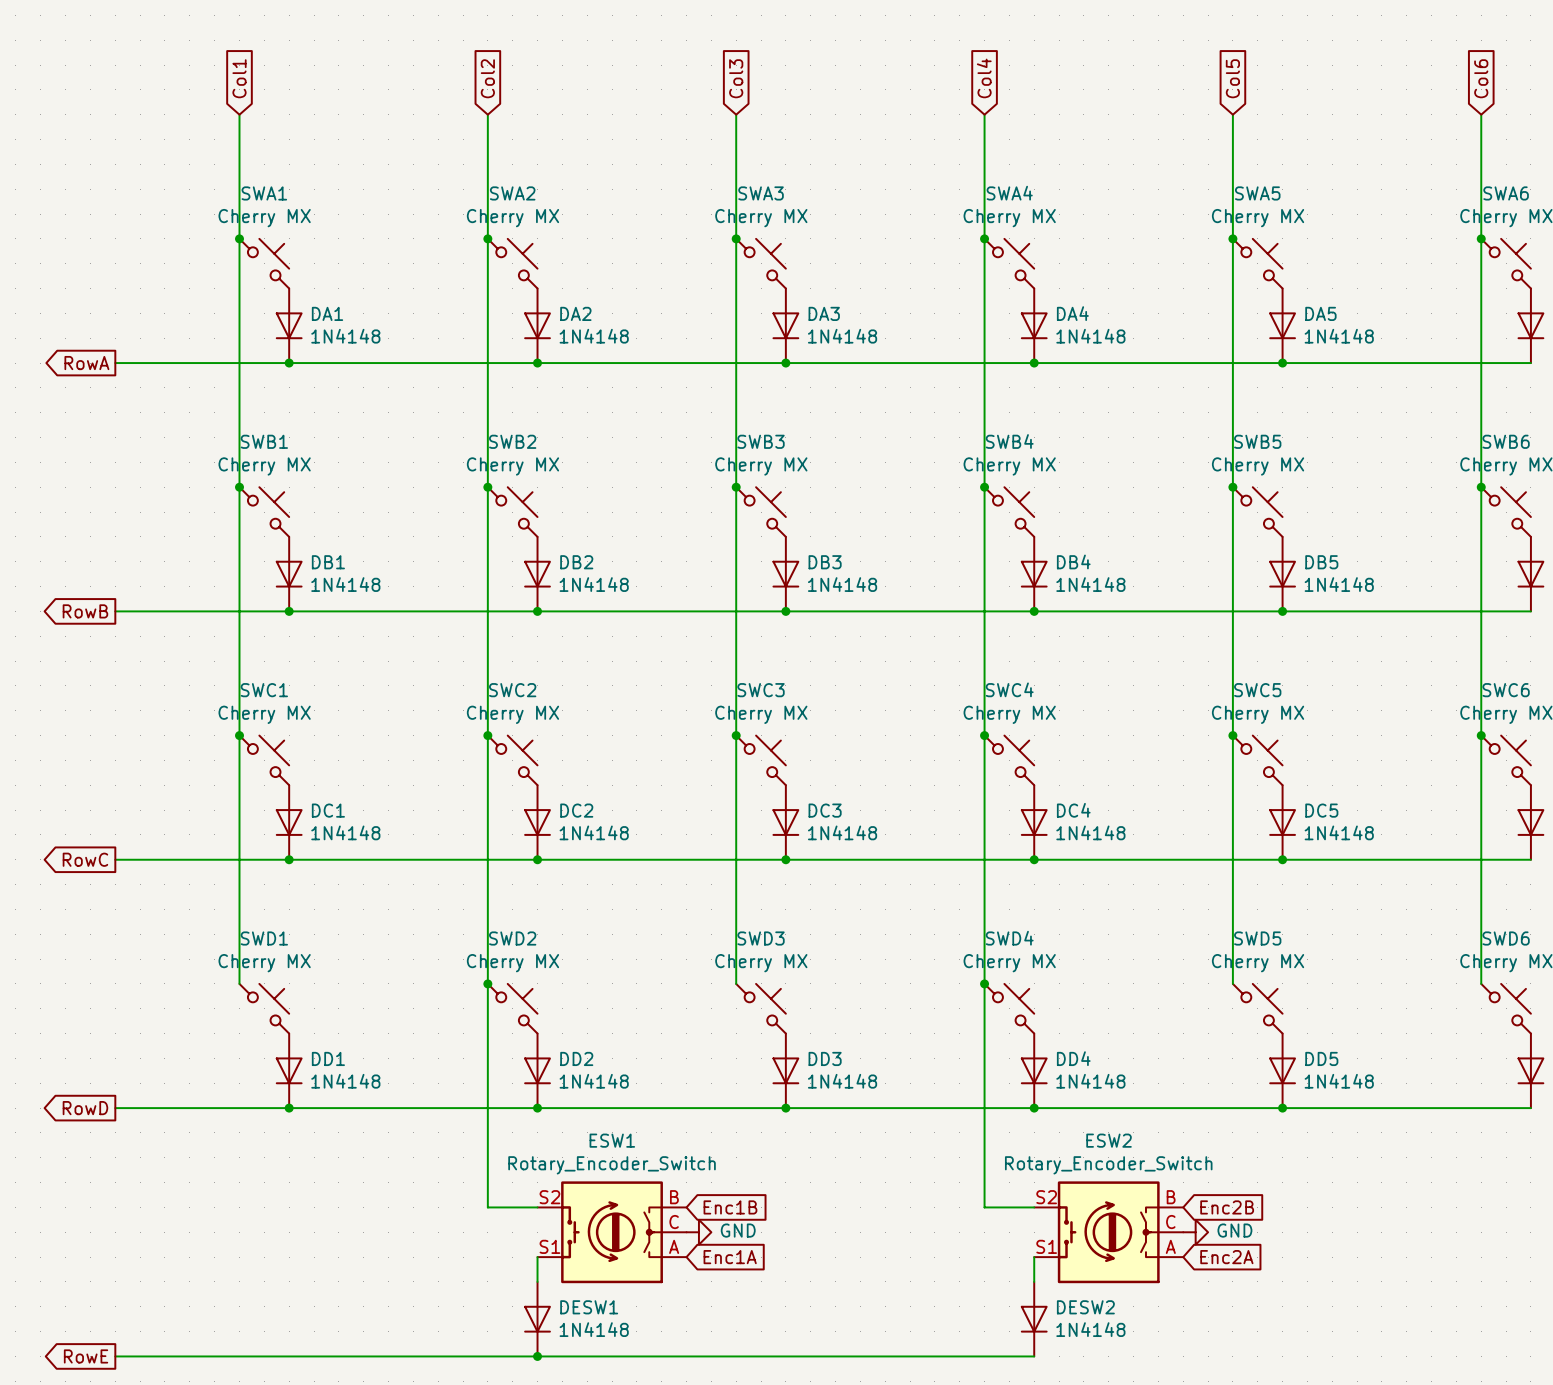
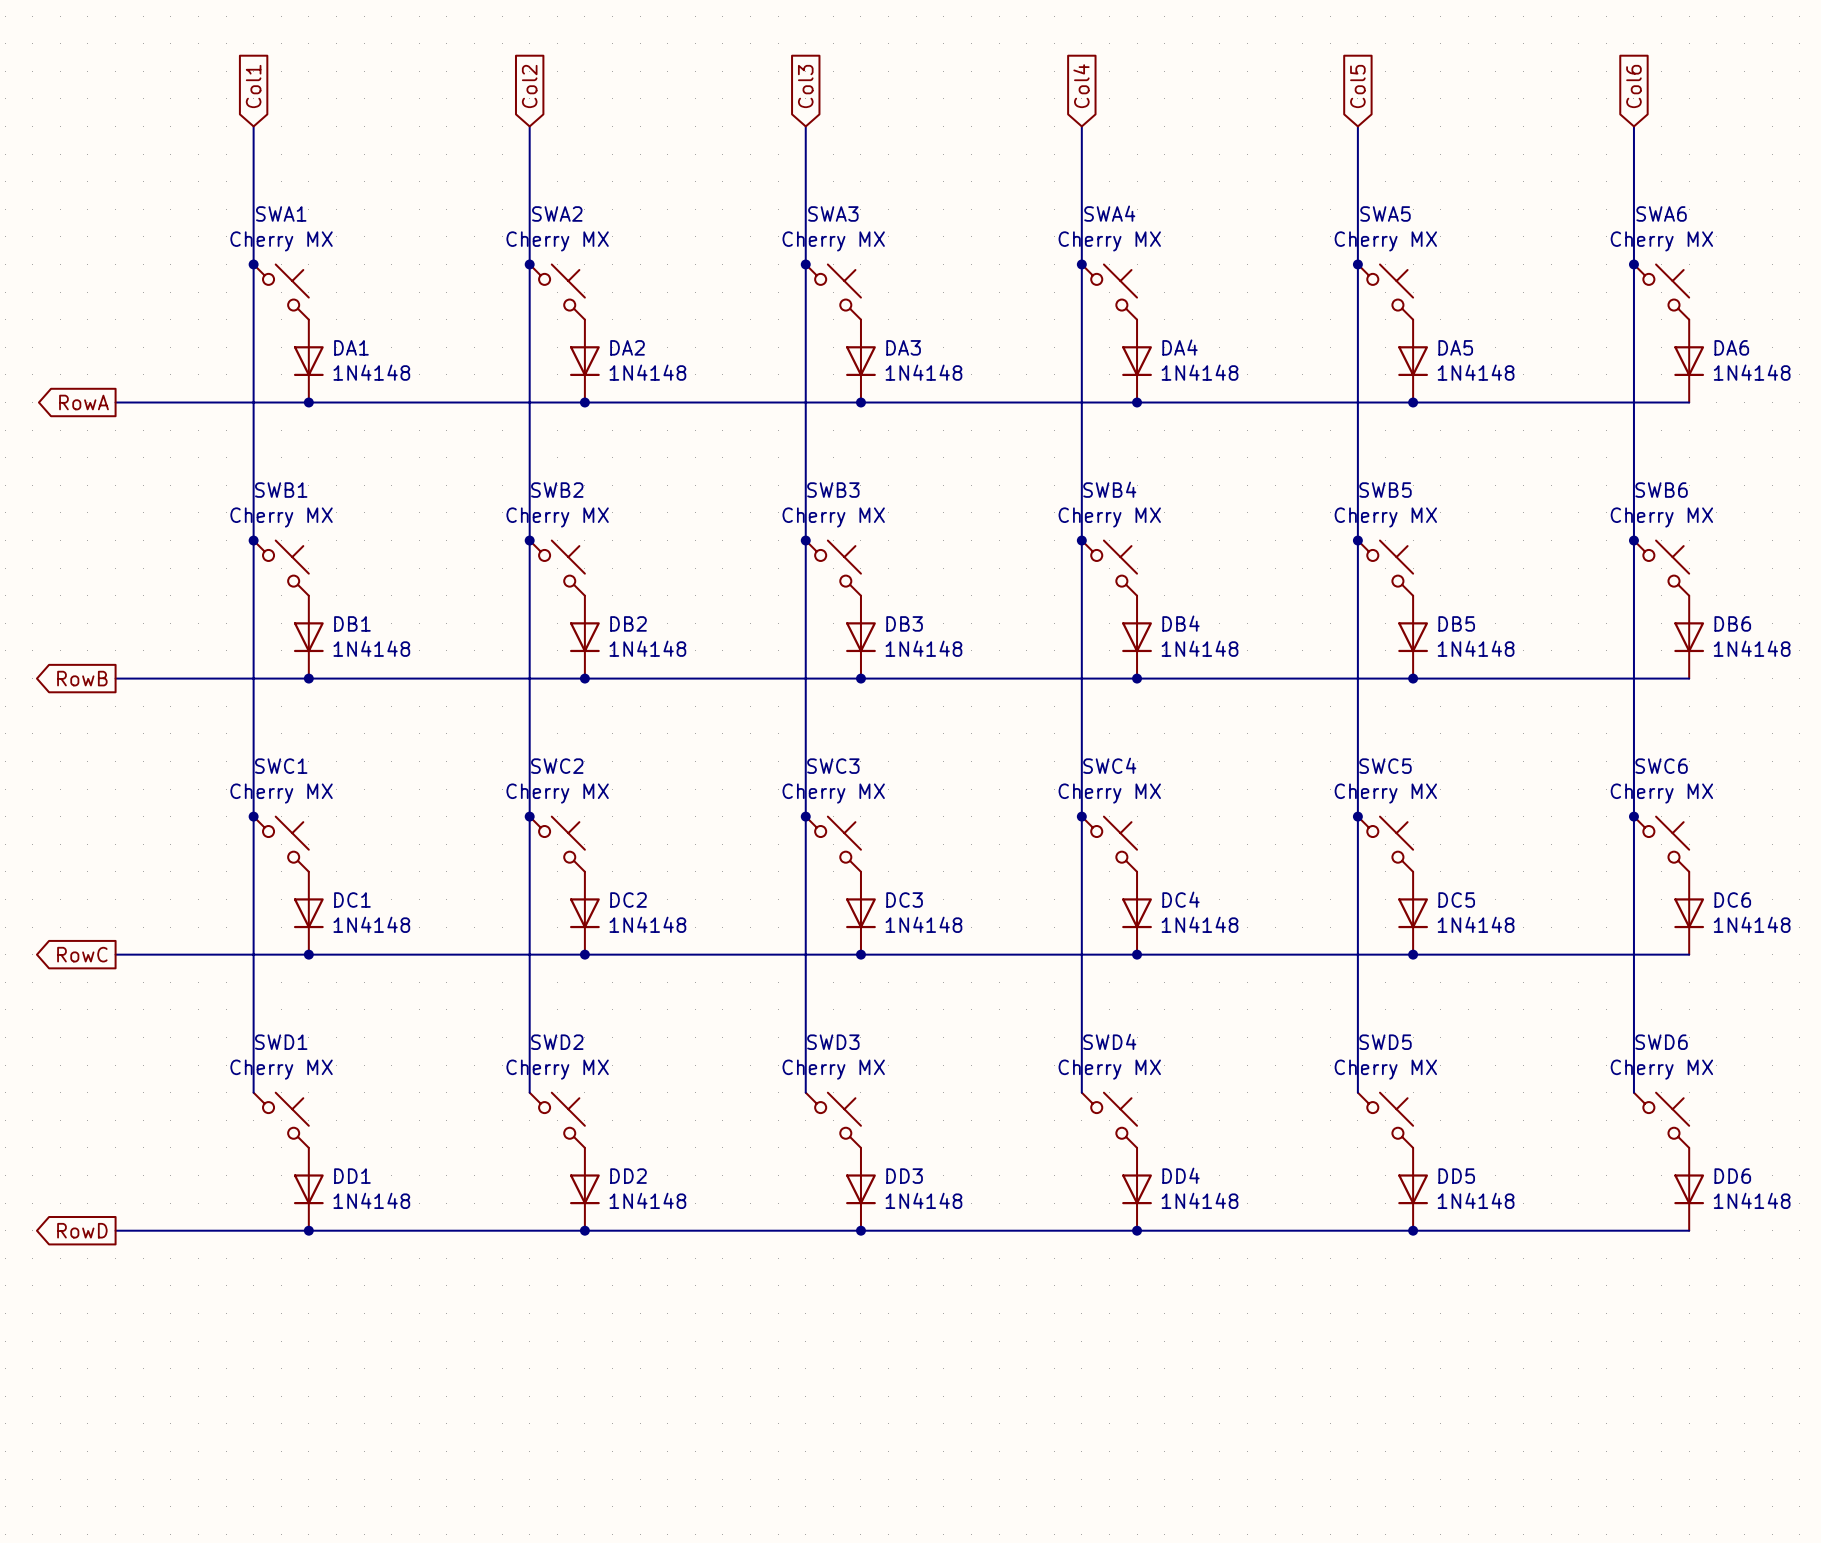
wire: (487, 983) (487, 1207) (537, 1207) -> none
junction: (487, 983) -> none
wire: (984, 983) (984, 1207) (1034, 1207) -> none
junction: (984, 983) -> none
global label: Enc1B (730, 1207) -> none
global label: Enc2B (1227, 1207) -> none
ESW1: Rotary_Encoder_Switch (612, 1232) -> none
power symbol: GND (698, 1232) -> none
ESW2: Rotary_Encoder_Switch (1108, 1232) -> none
power symbol: GND (1195, 1232) -> none
wire: (537, 1257) (537, 1281) -> none
global label: Enc1A (730, 1257) -> none
wire: (1034, 1257) (1034, 1281) -> none
global label: Enc2A (1226, 1257) -> none
DESW1: 1N4148 (537, 1319) -> none
DESW2: 1N4148 (1034, 1319) -> none
global label: RowE (86, 1356) -> none
wire: (115, 1356) (1034, 1356) -> none
junction: (537, 1356) -> none

